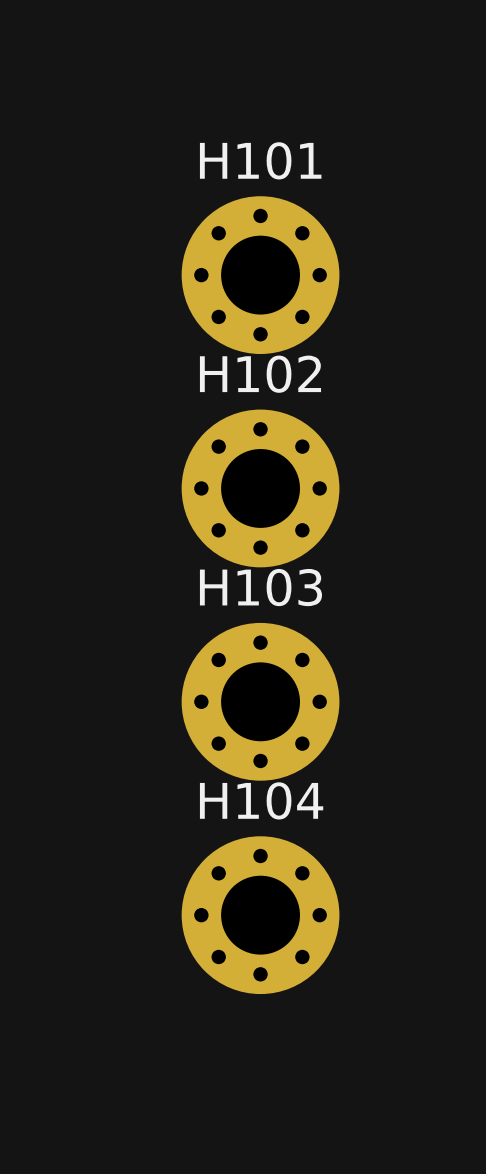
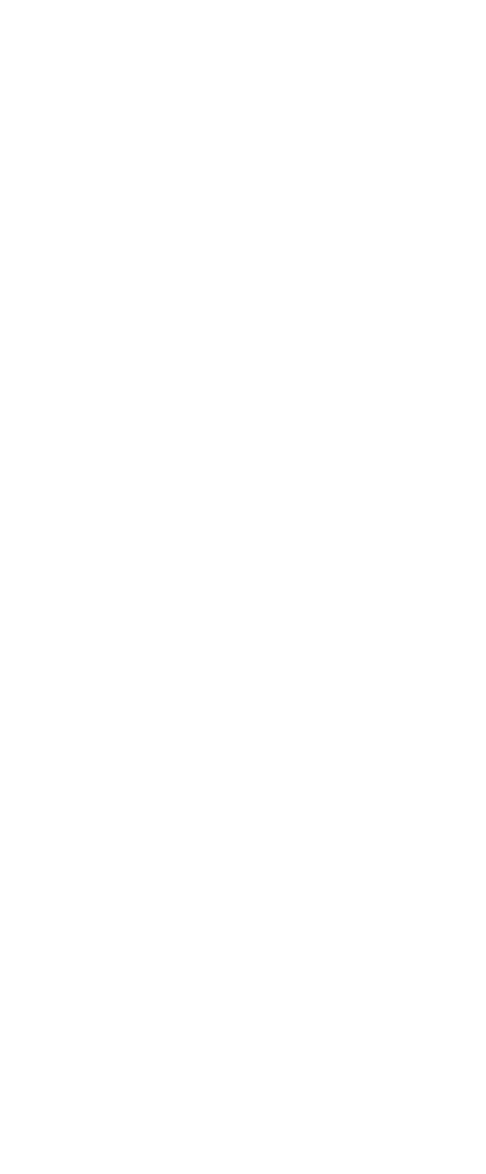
H101: (260, 275) -> none
H102: (260, 488) -> none
H103: (260, 701) -> none
H104: (260, 915) -> none

